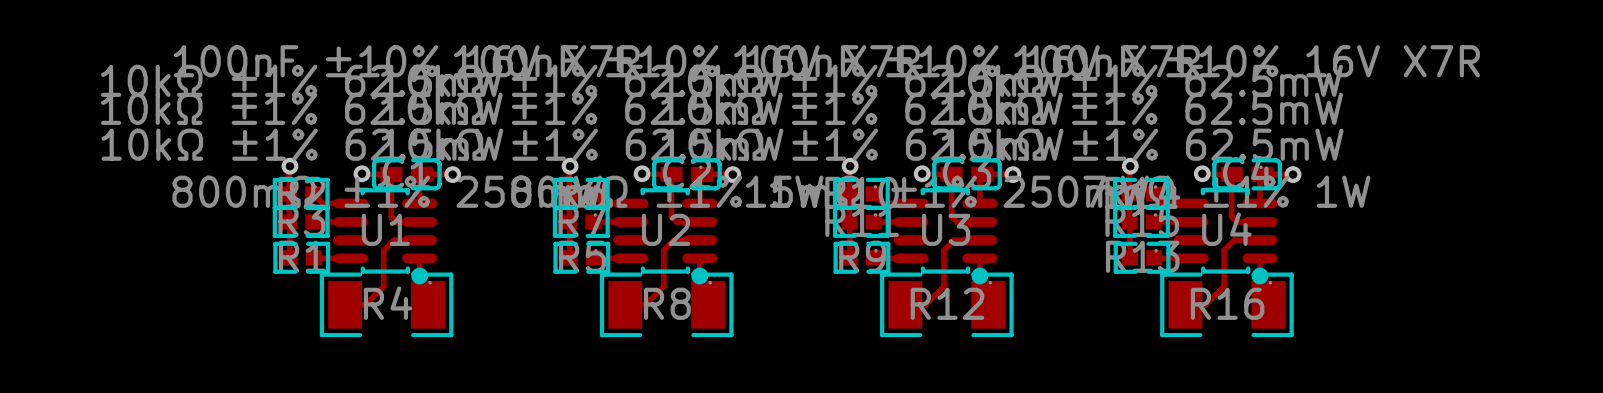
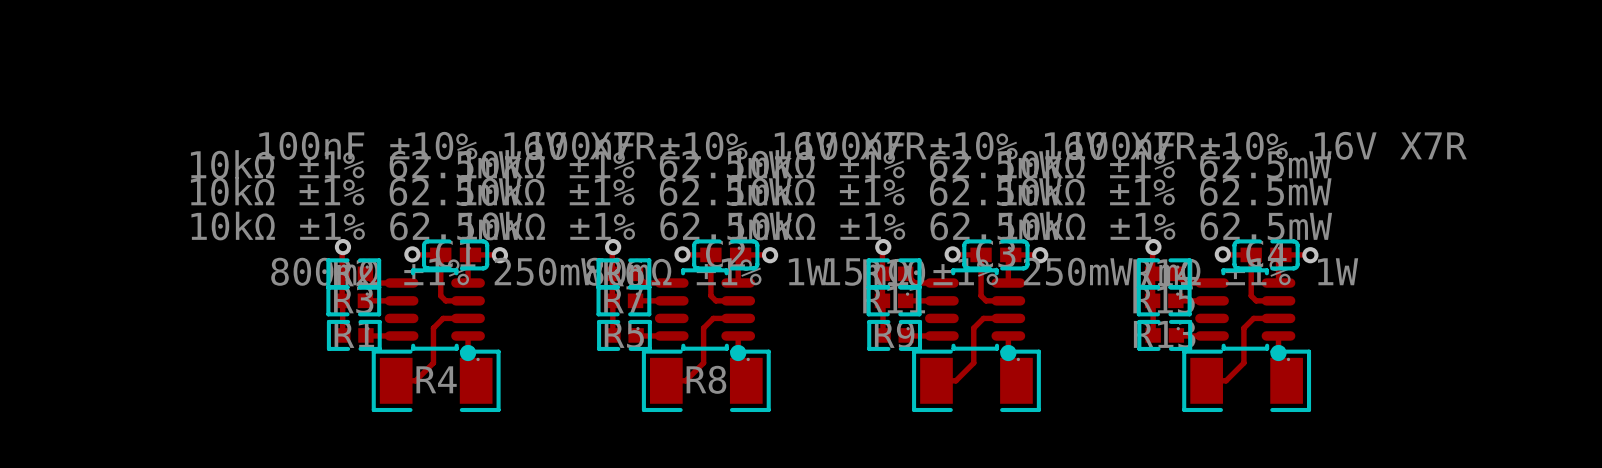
U1 name: U1 (385, 229) -> none
U2 name: U2 (665, 229) -> none
U3 name: U3 (946, 229) -> none
U4 name: U4 (1226, 229) -> none
R12 name: R12 (947, 303) -> none
R16 name: R16 (1227, 303) -> none

